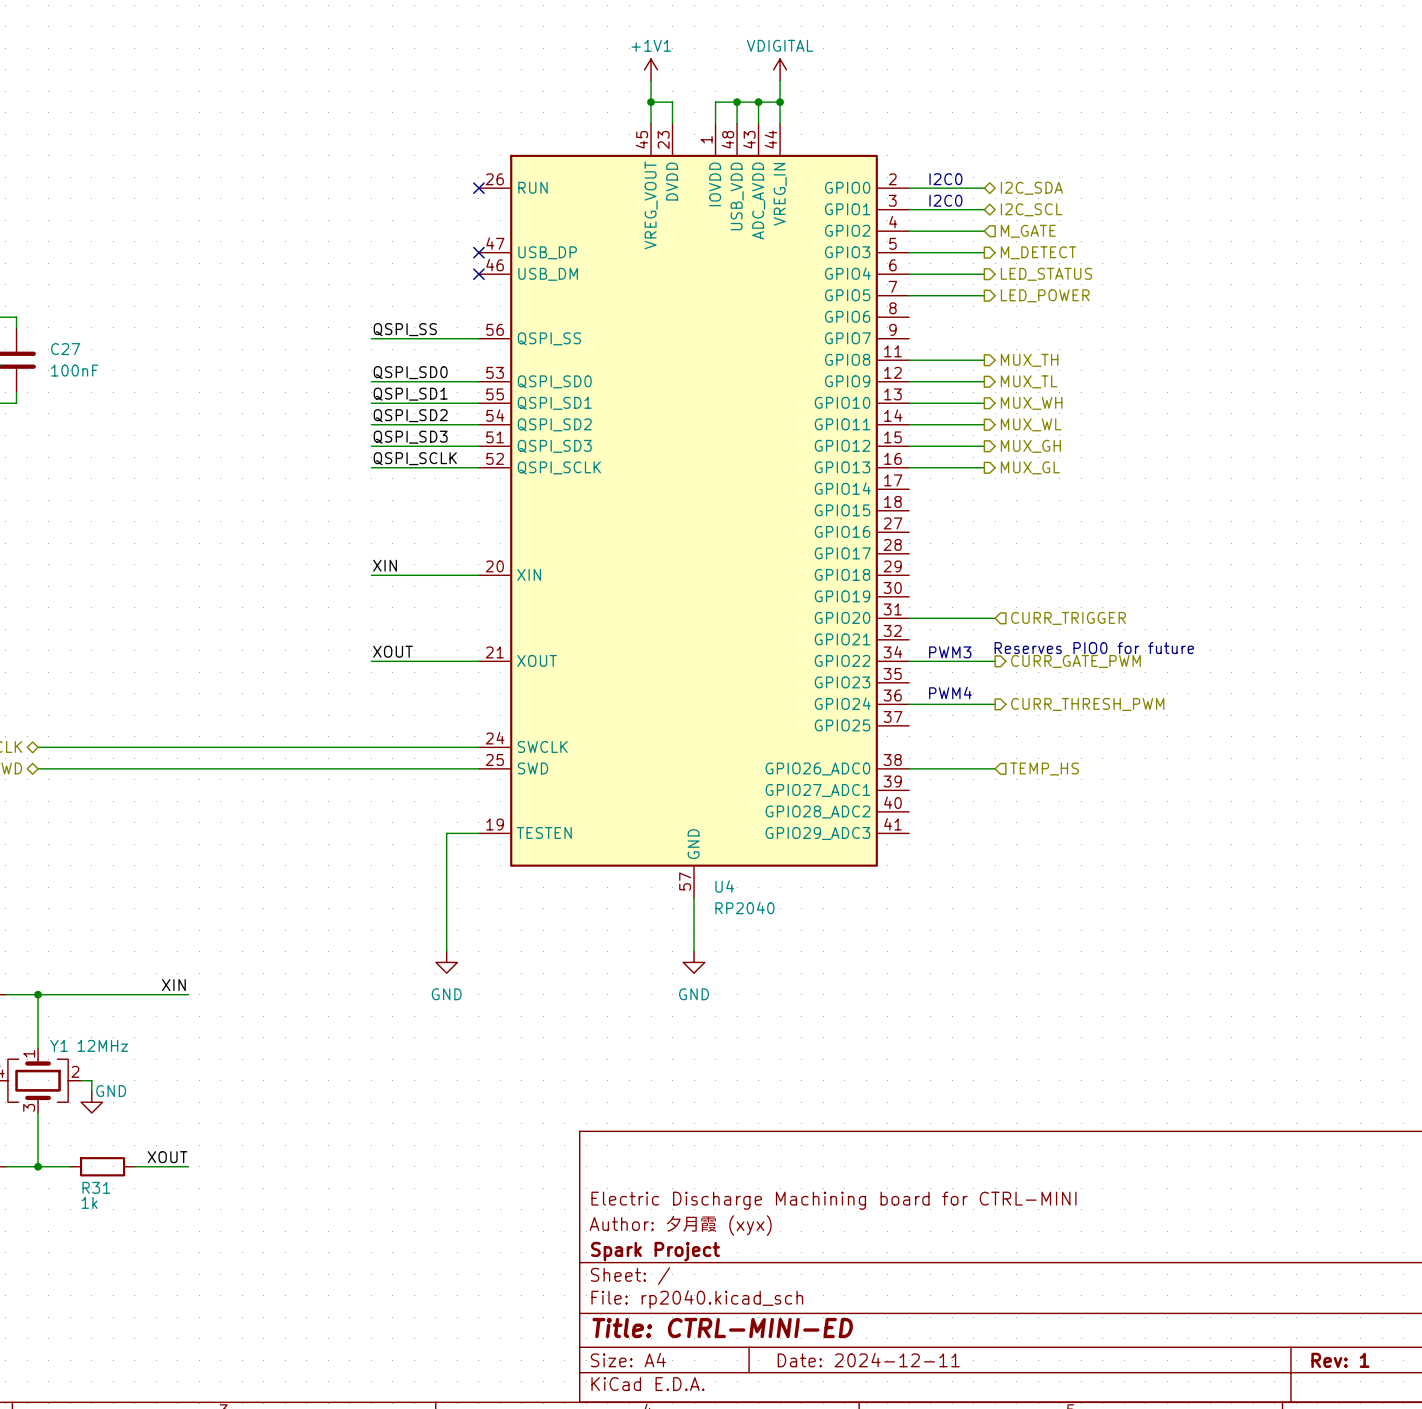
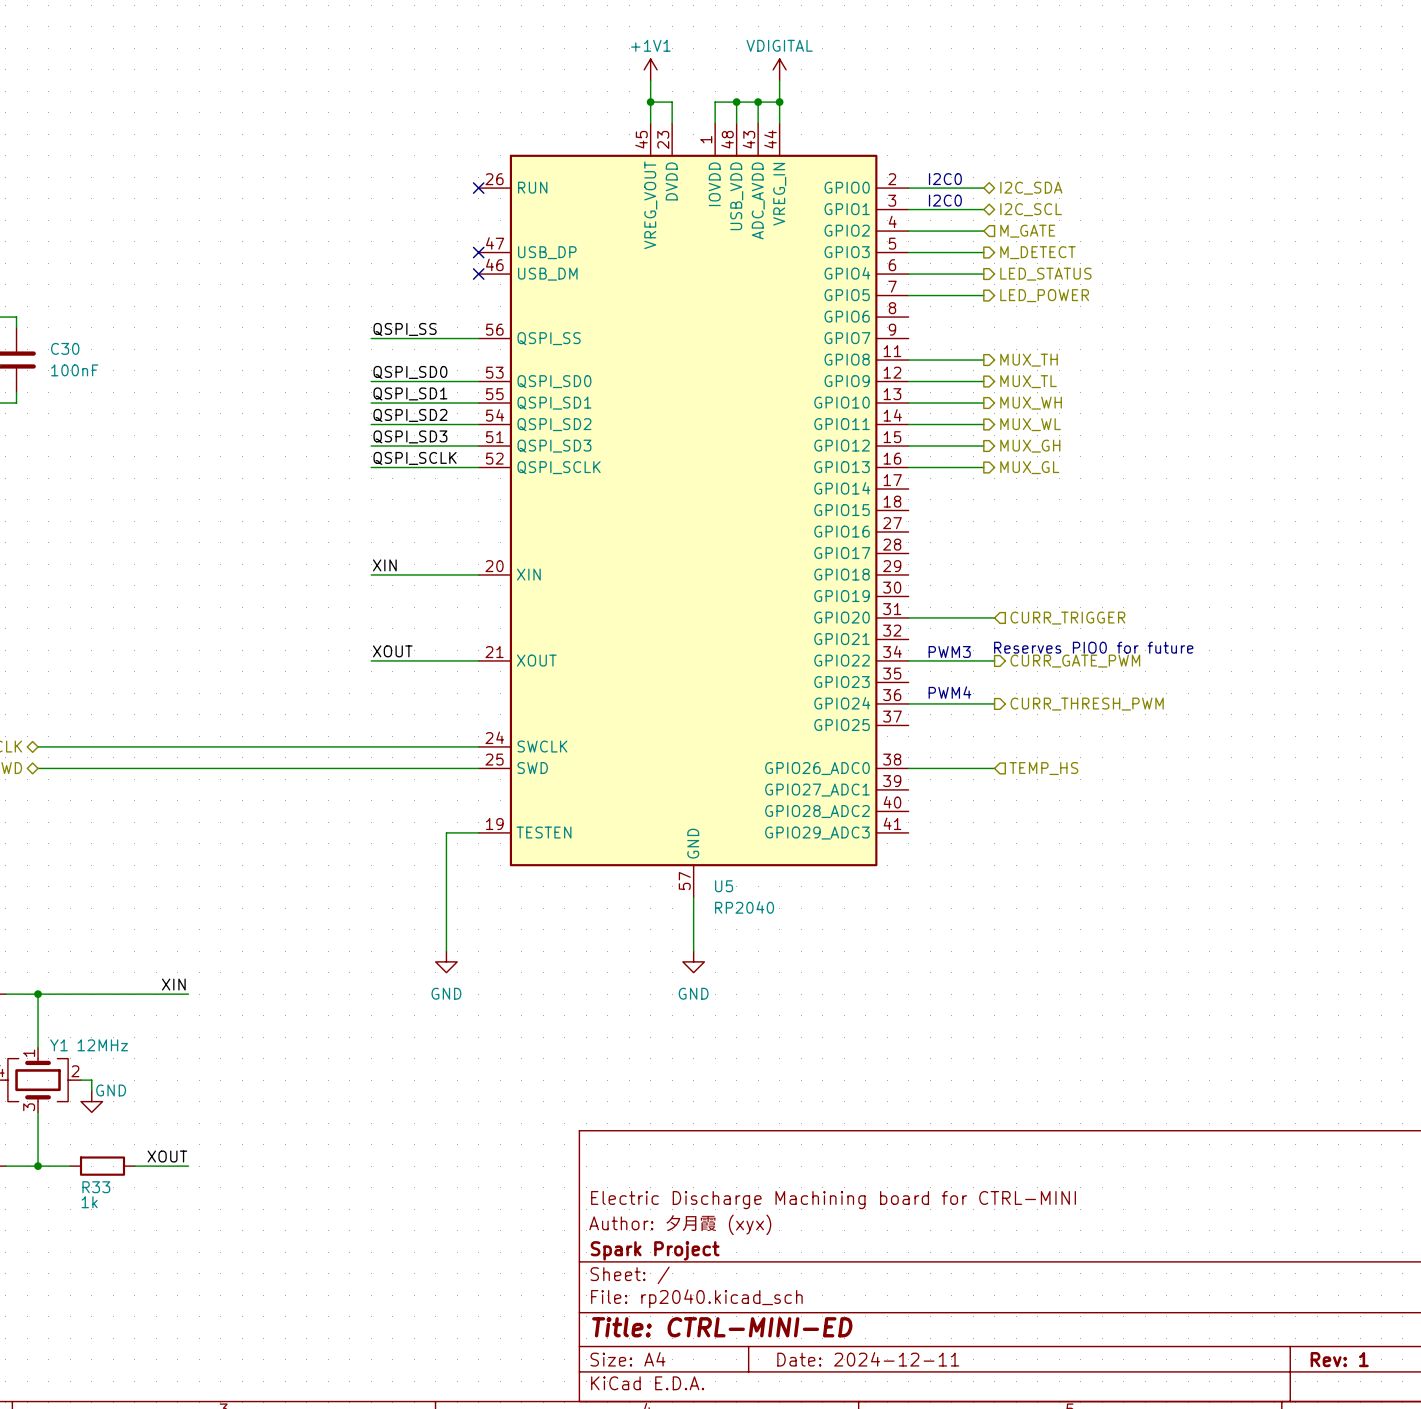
C27 name: C27 (65, 349) -> C30 (65, 348)
U4 name: U4 (724, 886) -> U5 (724, 886)
R31 name: R31 (96, 1187) -> R33 (96, 1187)

